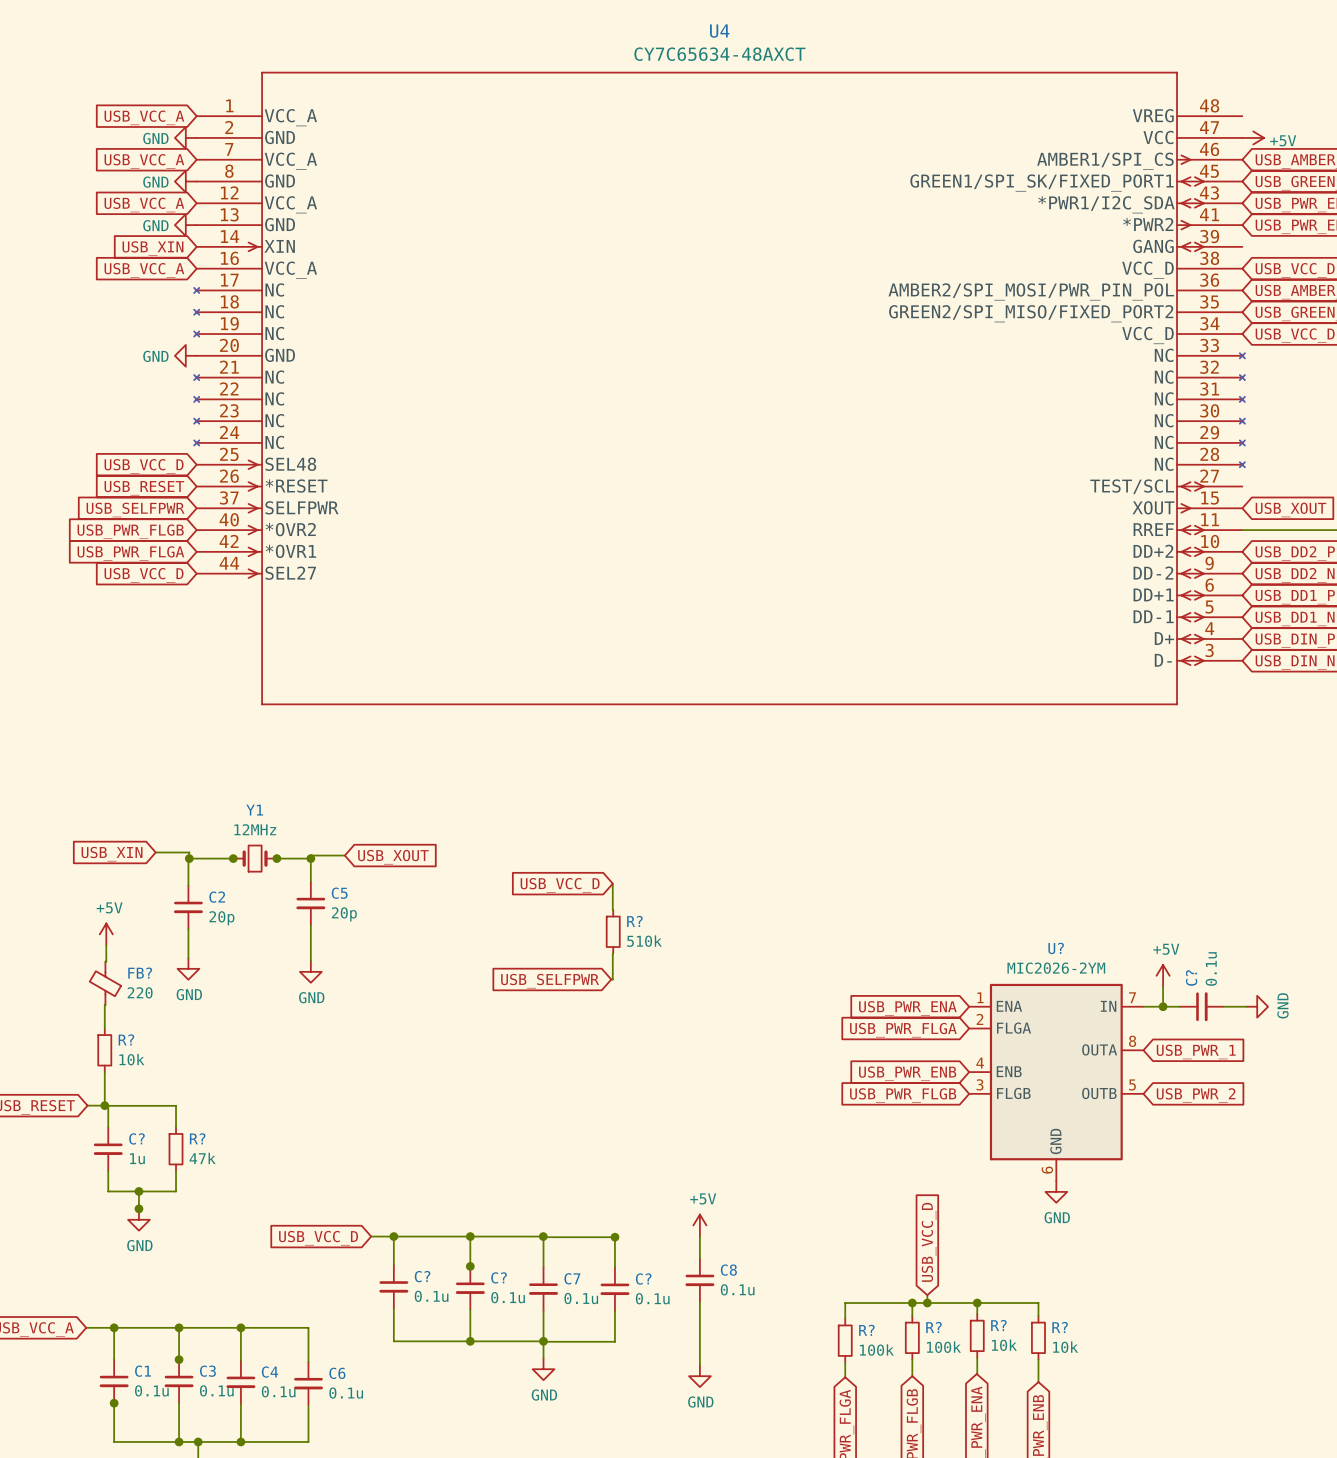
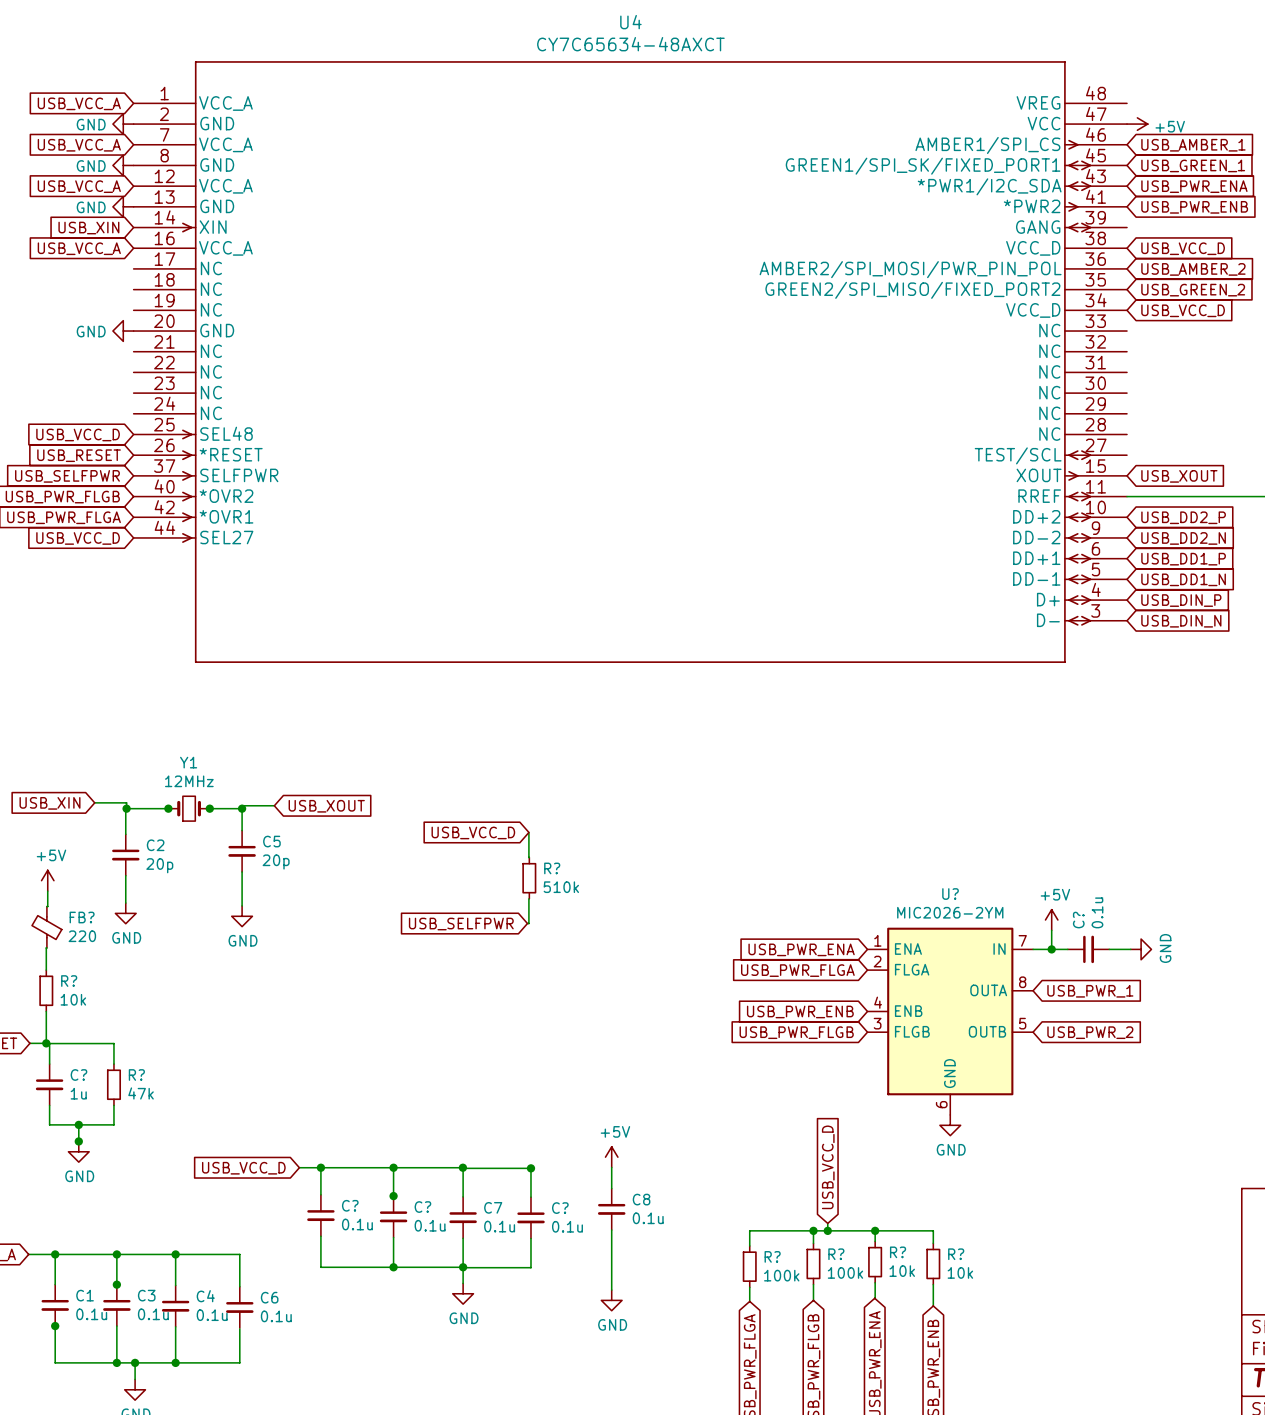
U4 symbol: [194, 71, 1245, 706] -> [133, 61, 1128, 663]

